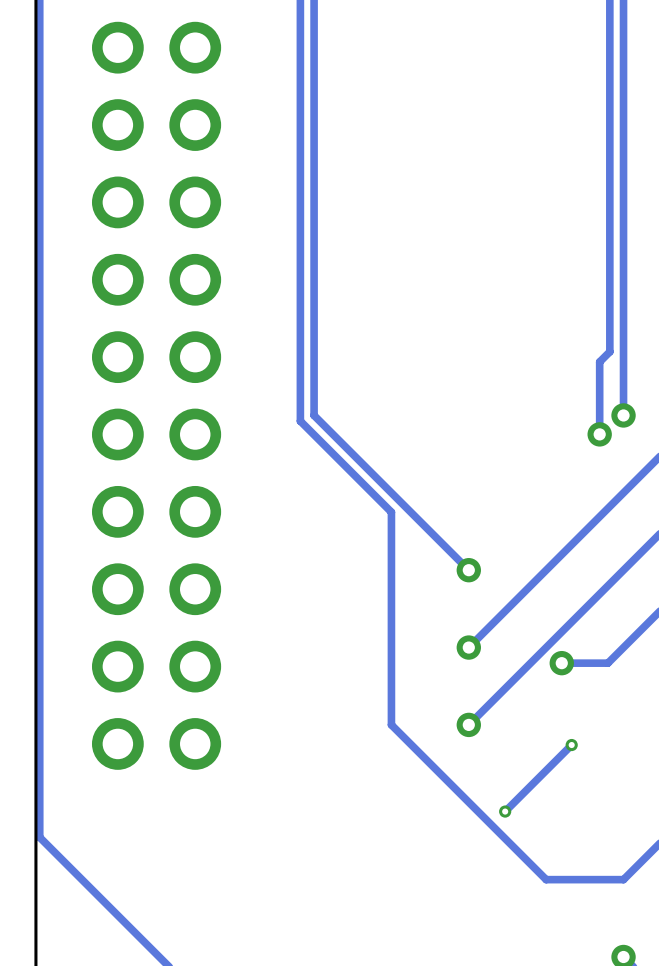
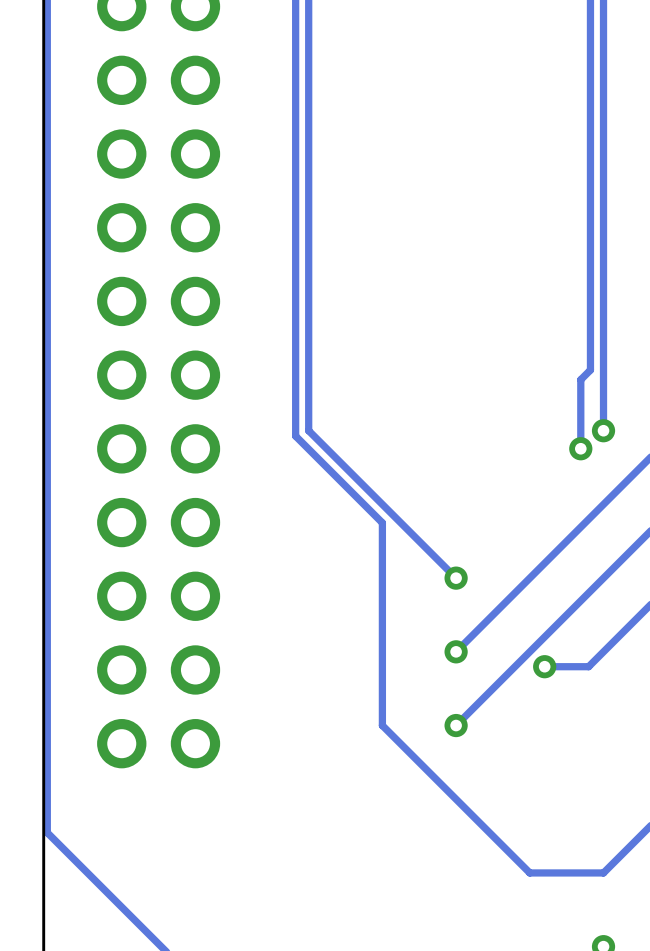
track: (571, 745) (505, 811) -> none
via: (571, 745) -> none
via: (505, 811) -> none

